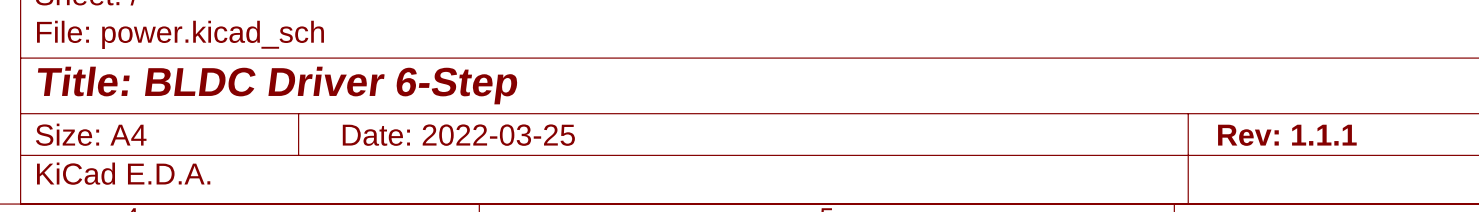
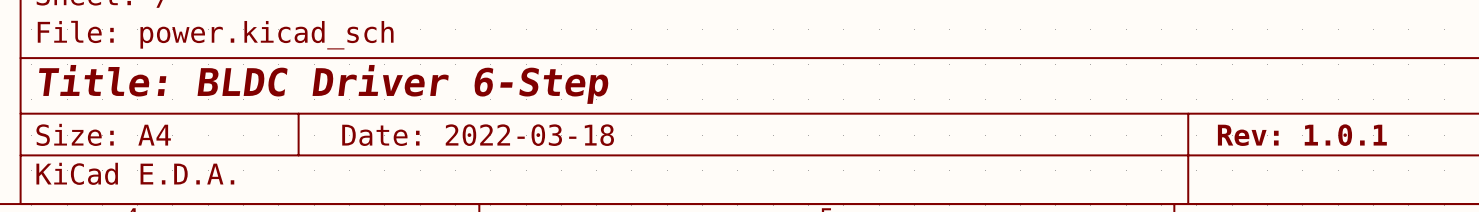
title block: Date: 2022-03-25 (458, 135) -> Date: 2022-03-18 (478, 135)
title block: Rev: 1.1.1 (1287, 135) -> Rev: 1.0.1 (1302, 135)

